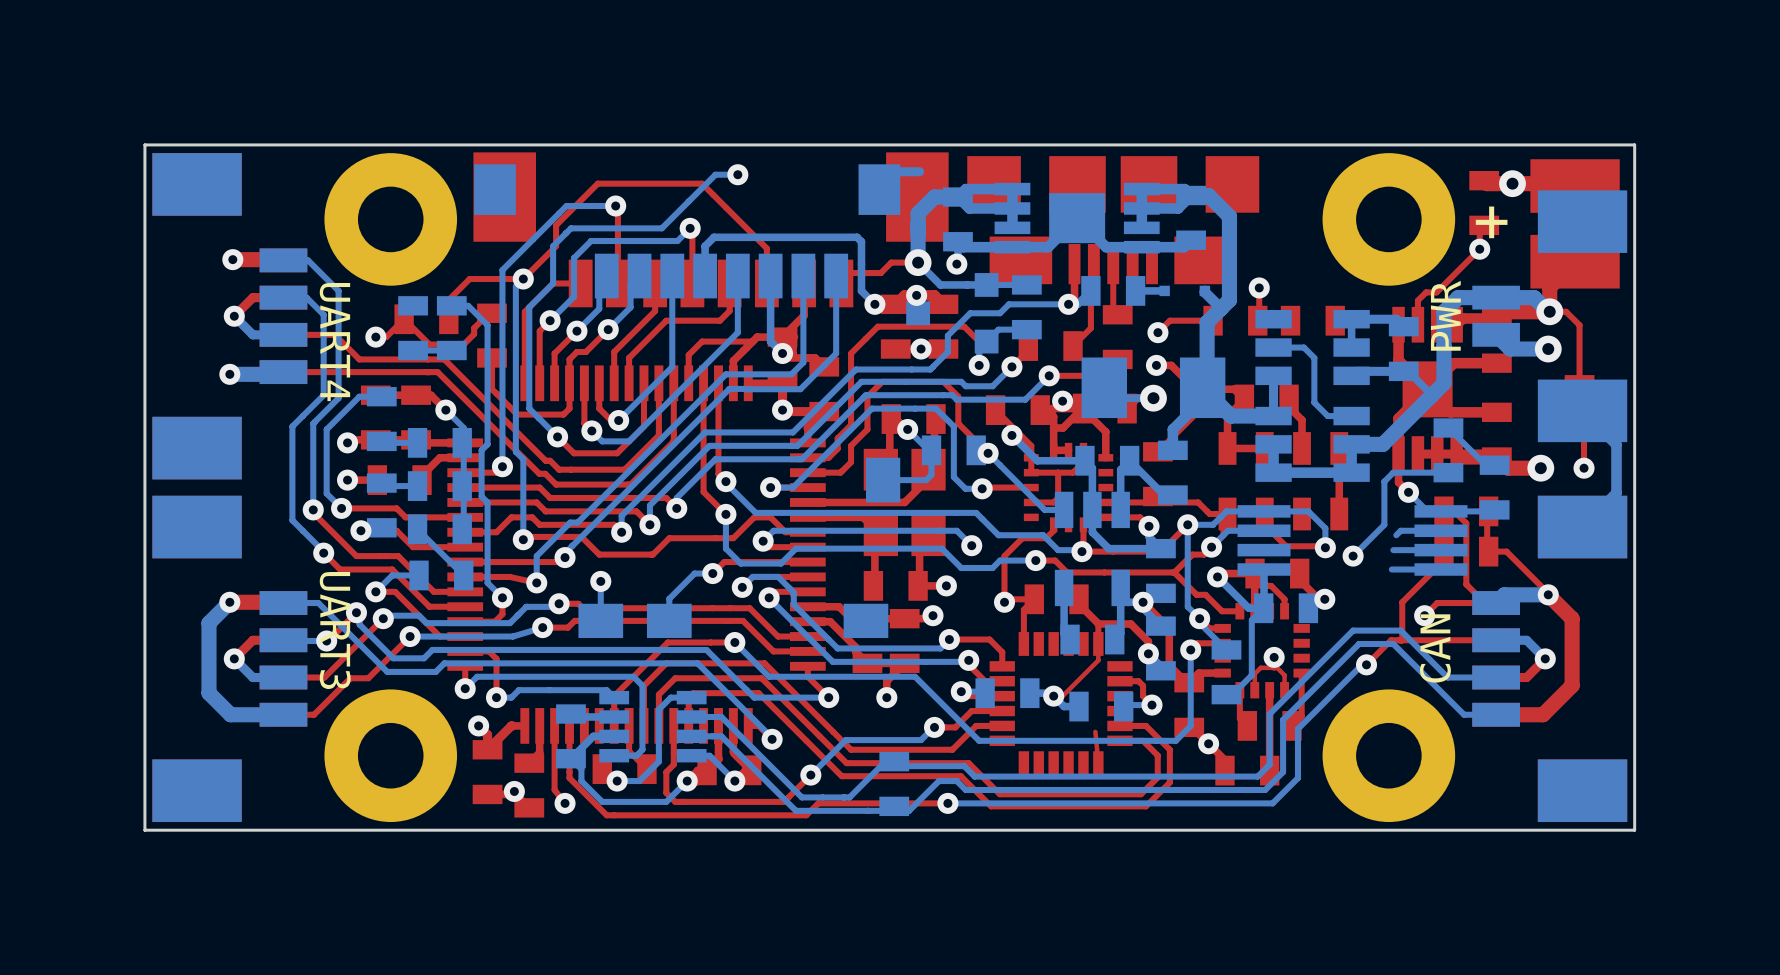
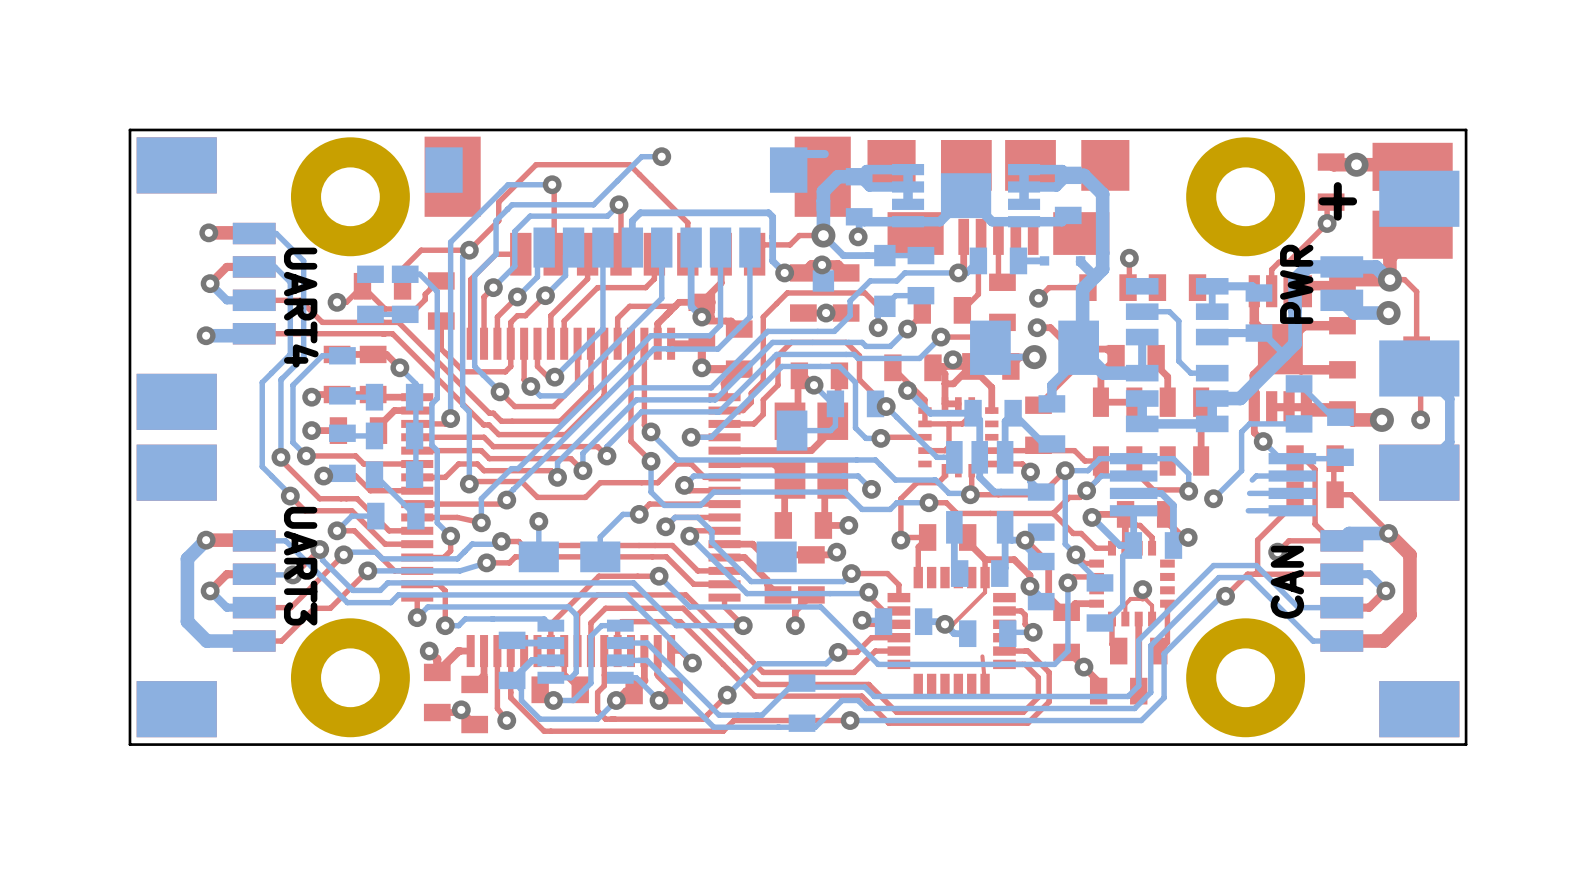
bottom track: none -> (1133, 493) (1161, 493) (1173, 505) (1173, 545)

